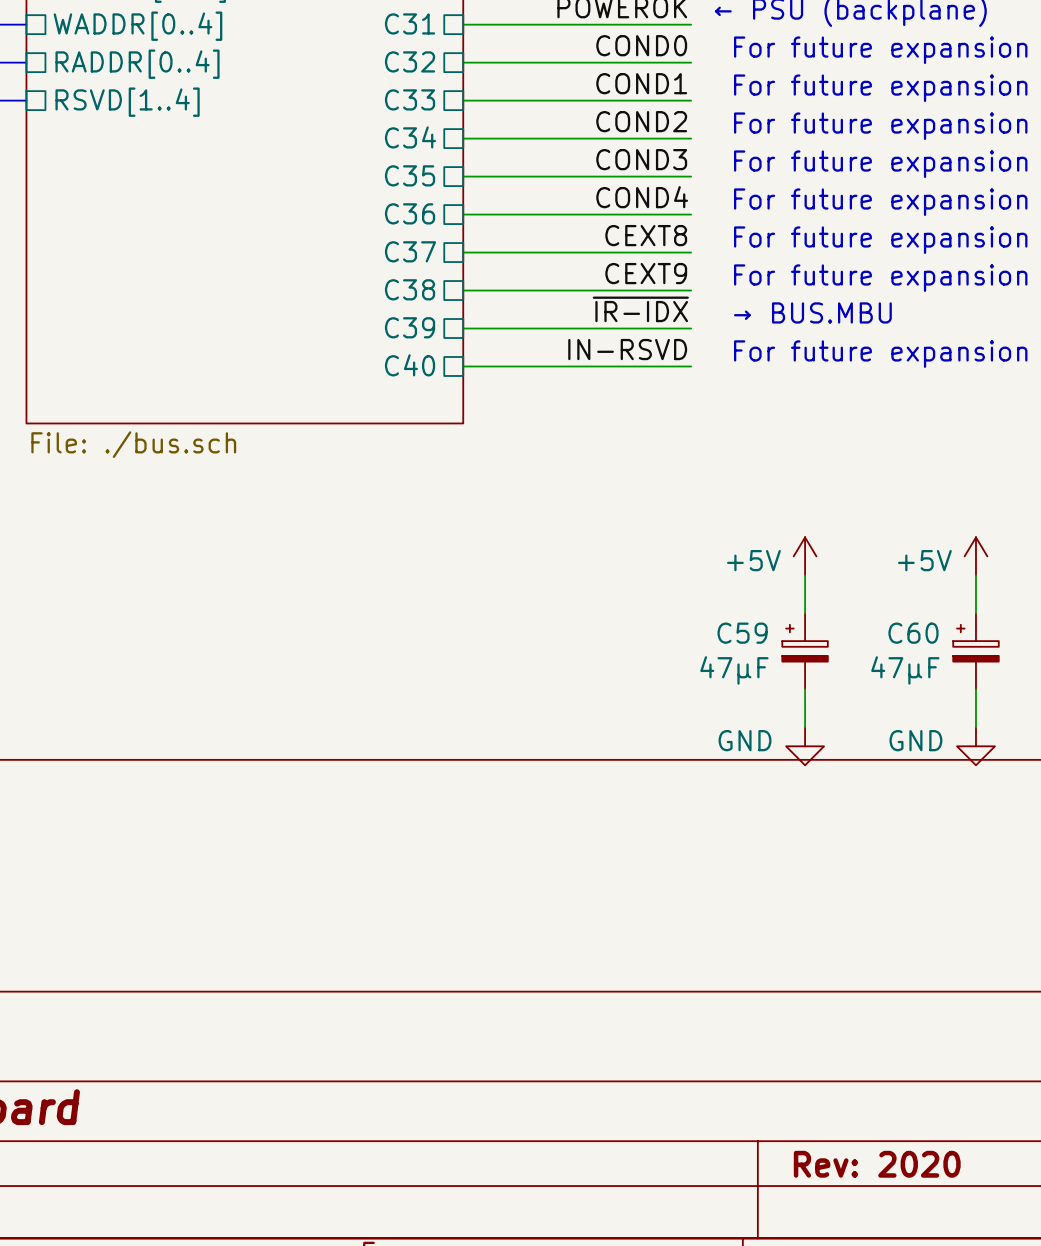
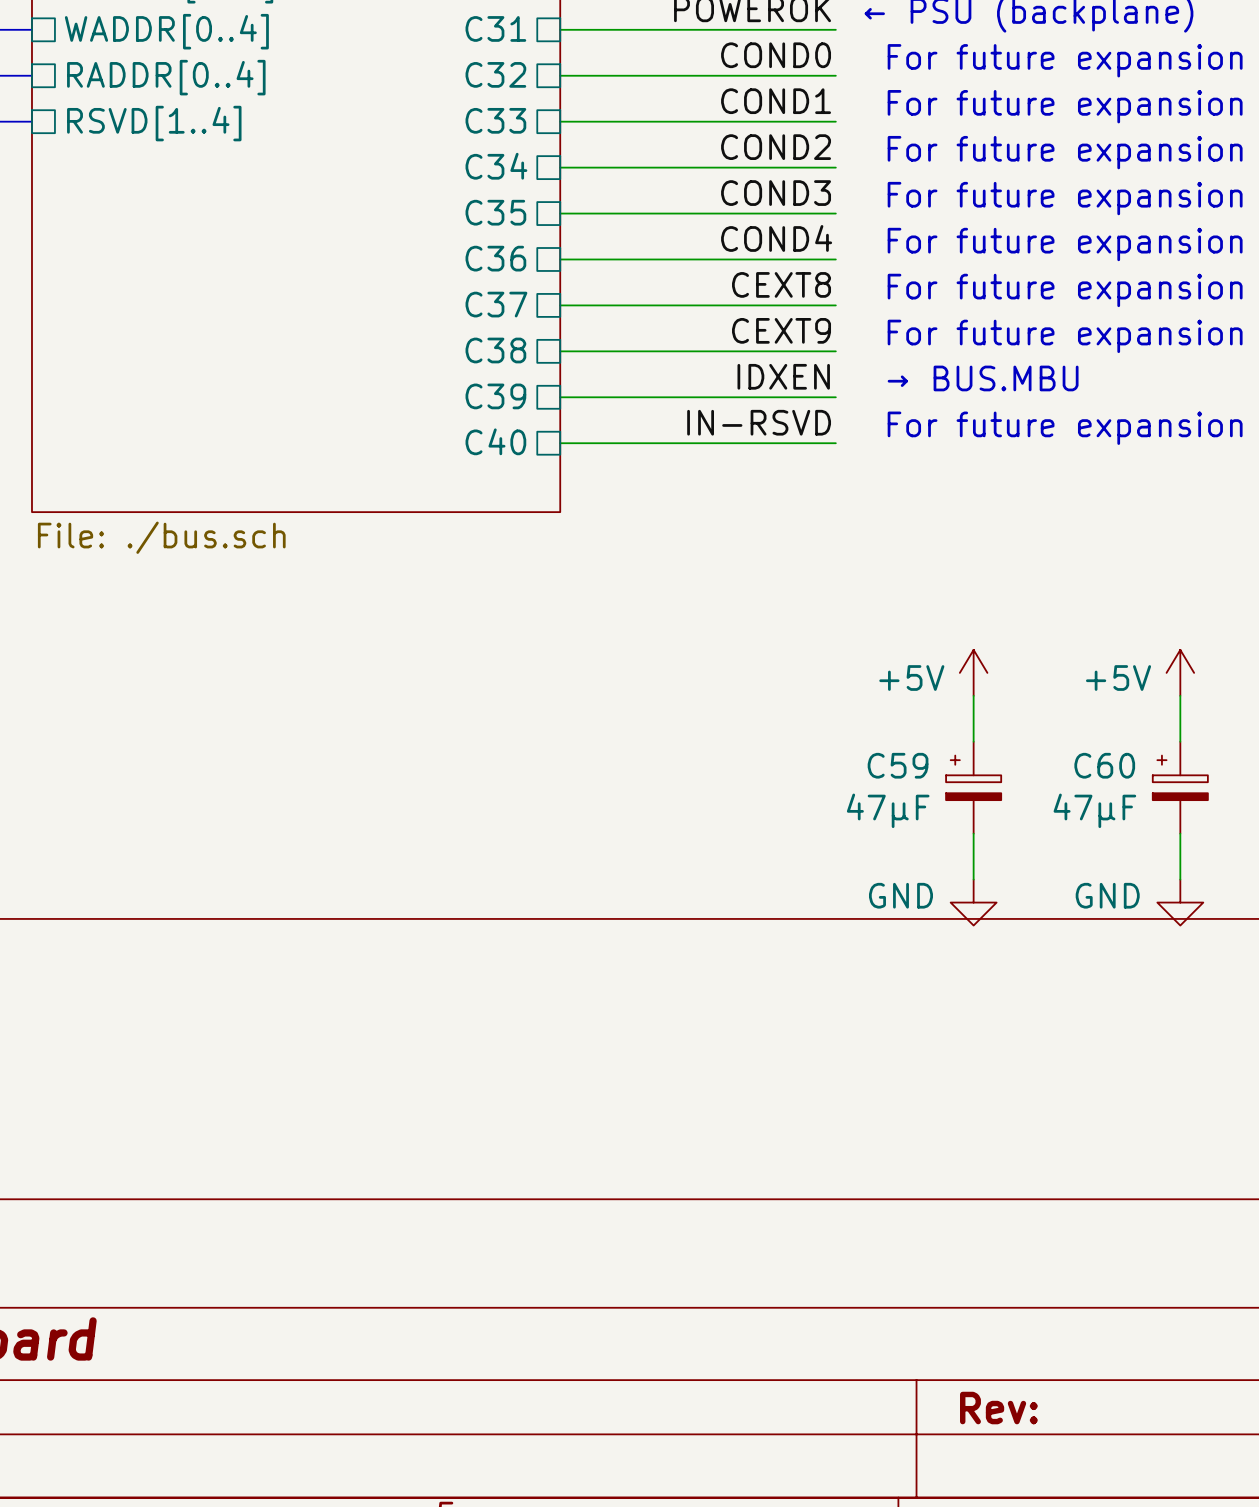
label: ~{IR-IDX} (640, 309) -> IDXEN (783, 376)
title block: Rev: 2020 (877, 1164) -> Rev: (998, 1408)

